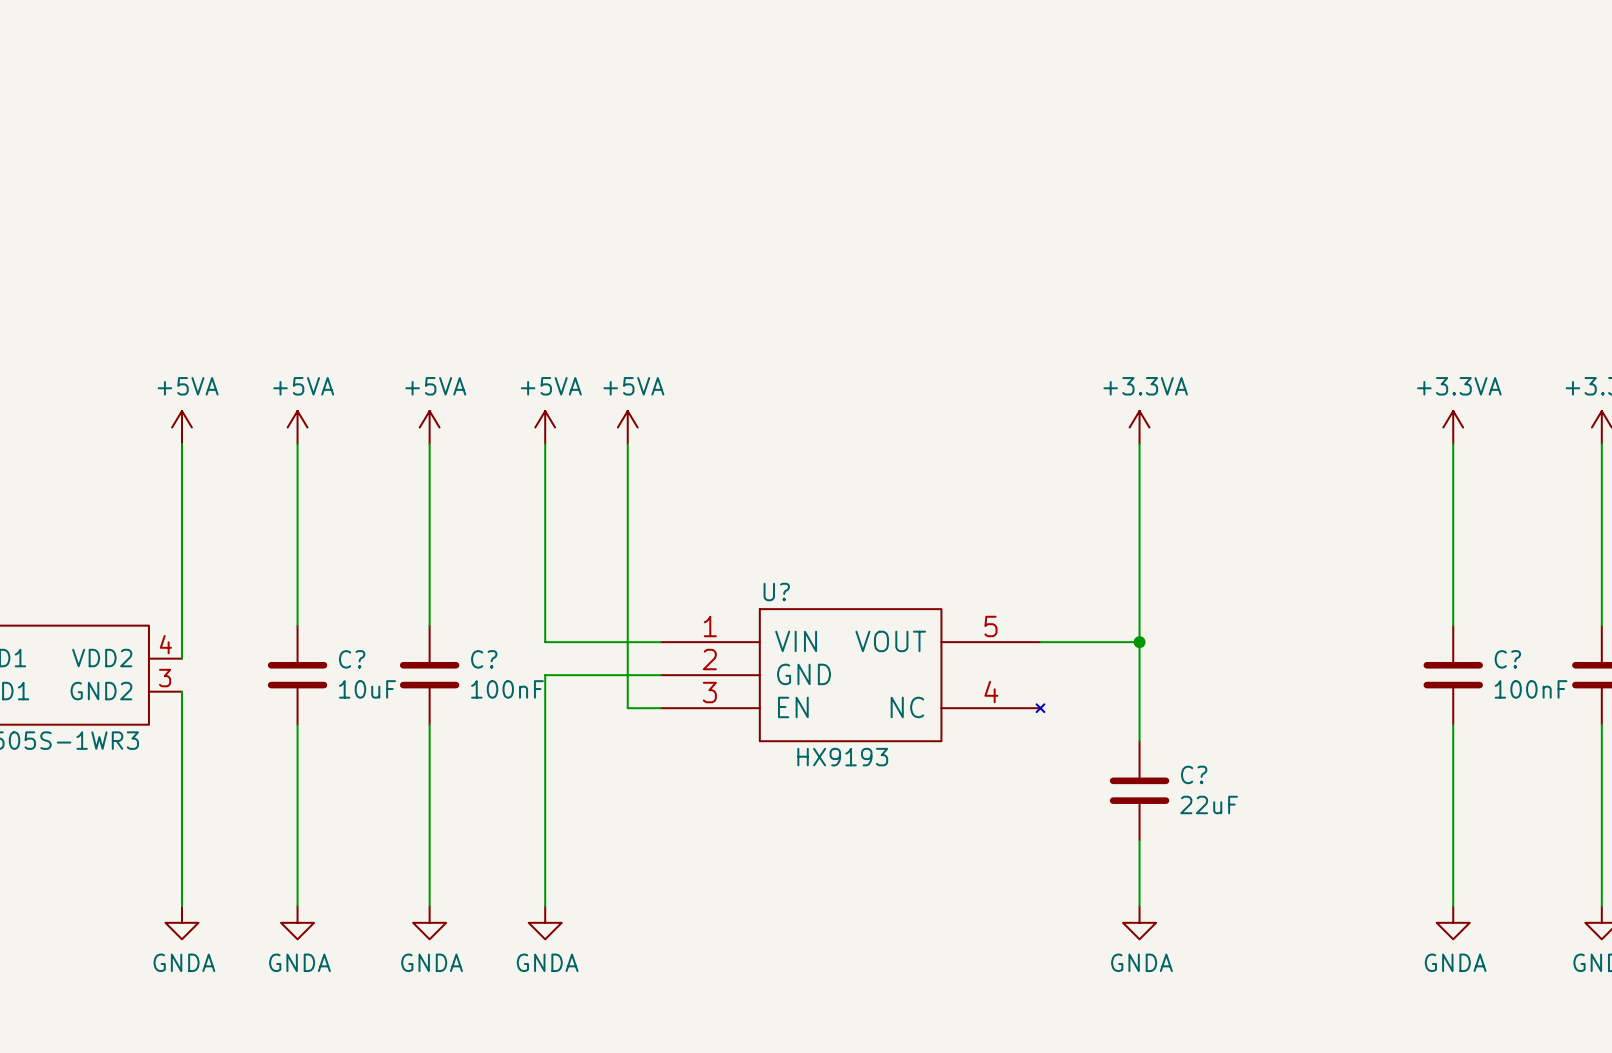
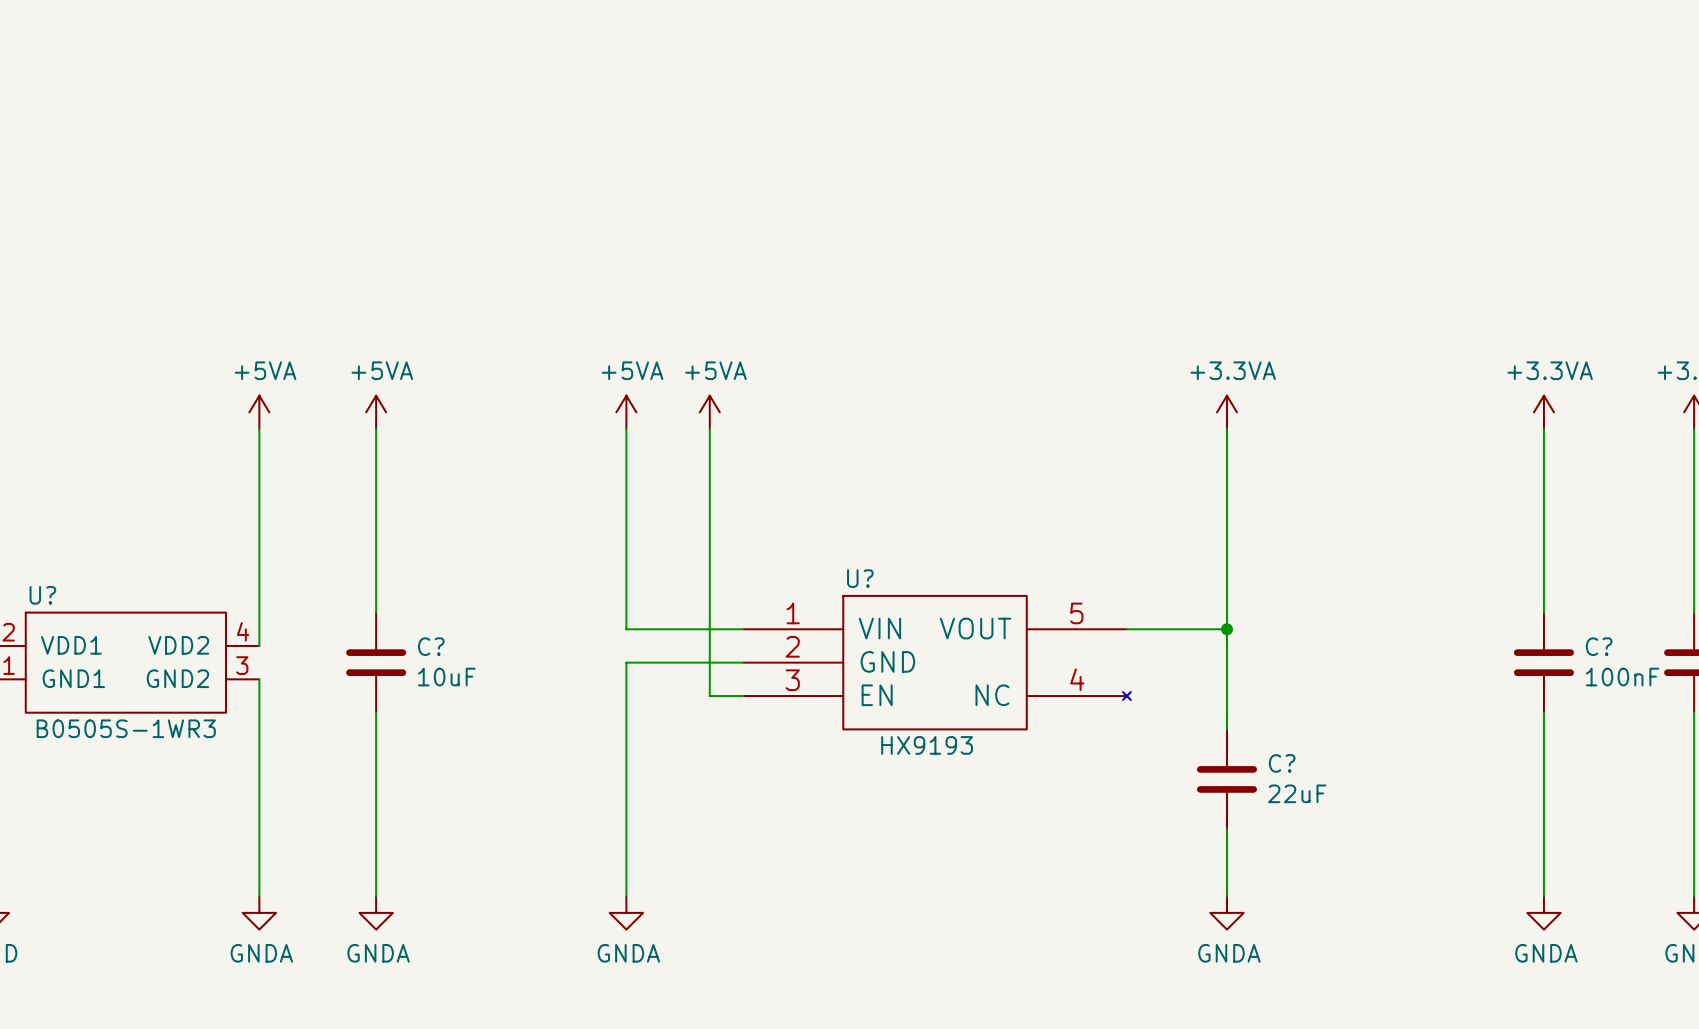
power symbol: +5VA (429, 427) -> none
wire: (429, 444) (429, 625) -> none
C?: 100nF (429, 675) -> none
wire: (429, 724) (429, 906) -> none
power symbol: GNDA (429, 922) -> none

